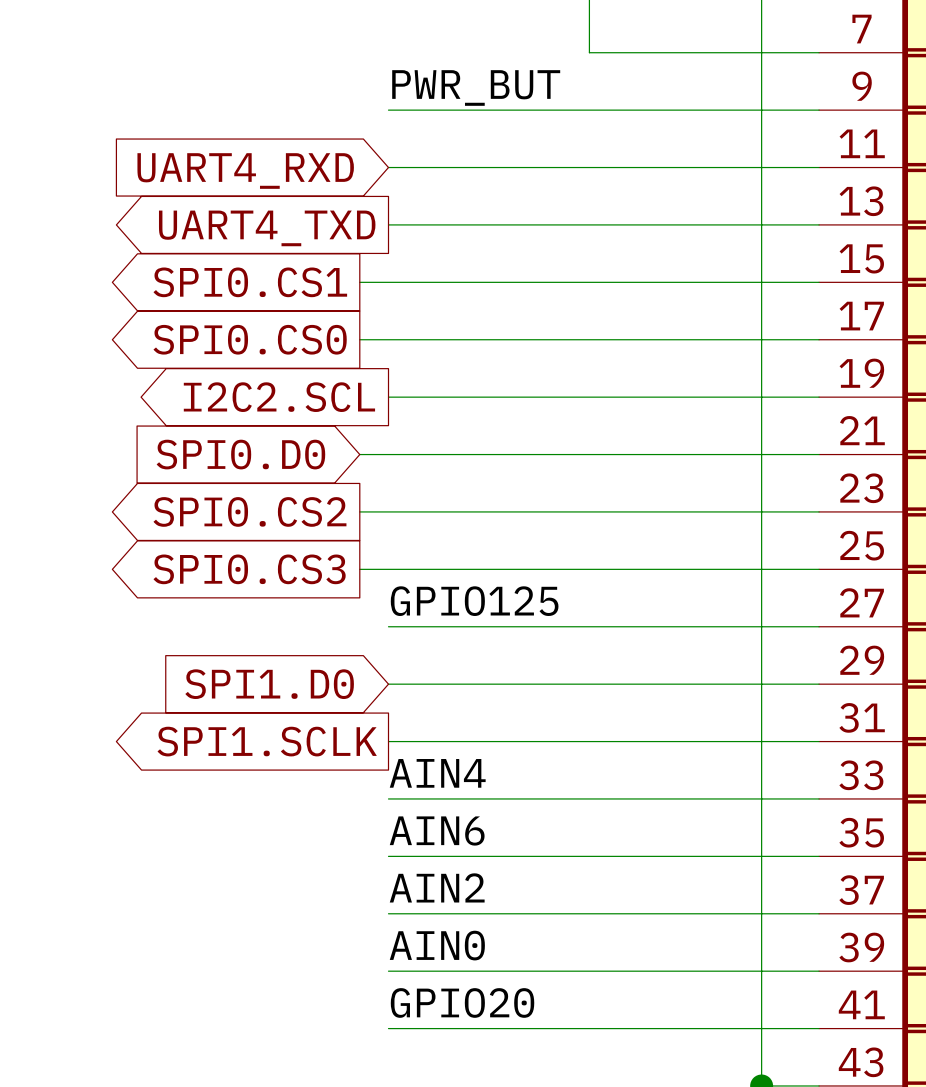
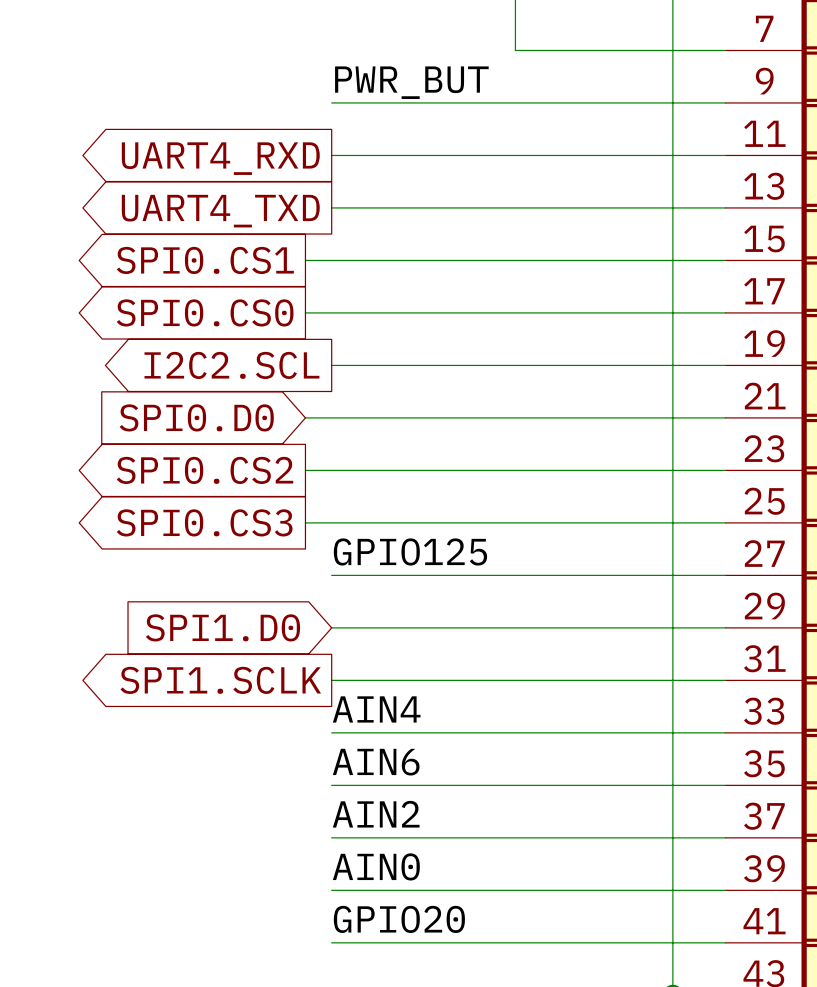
global label shape: input (245, 171) -> output (220, 158)

